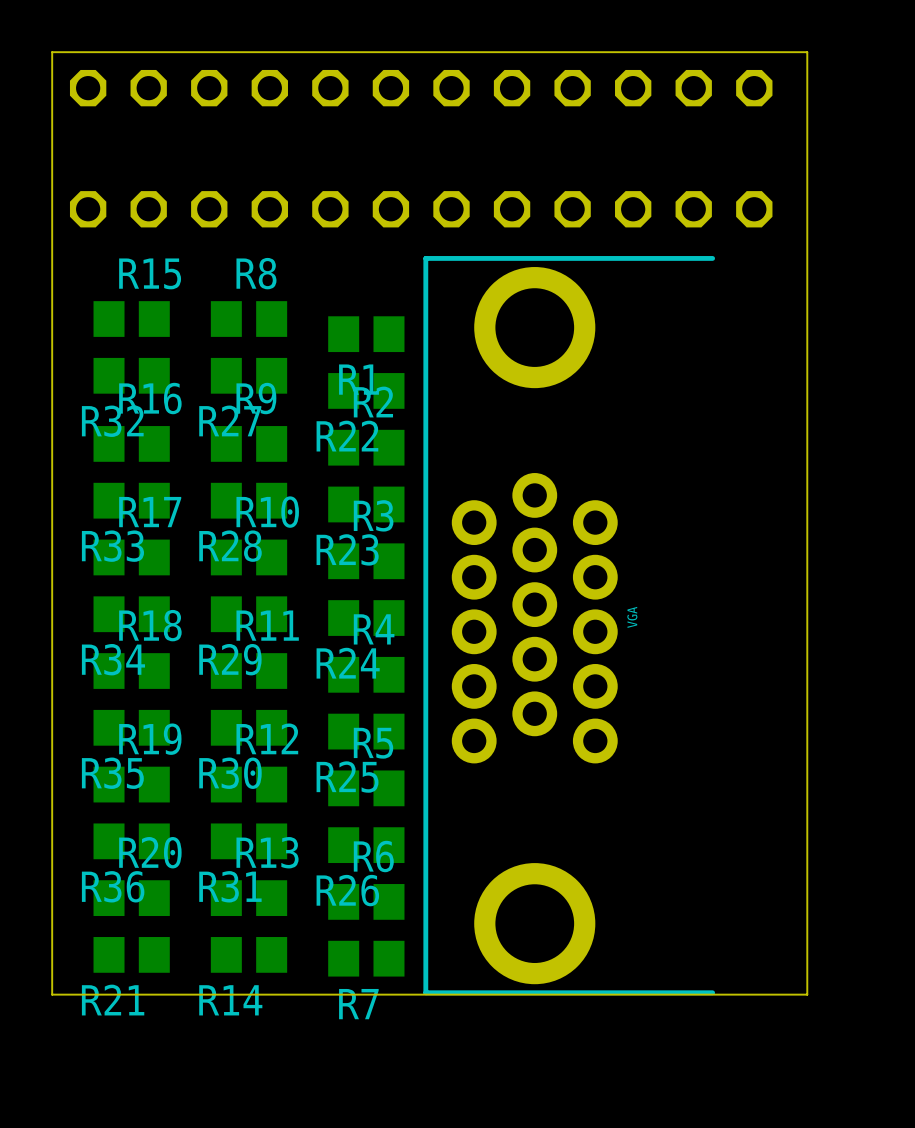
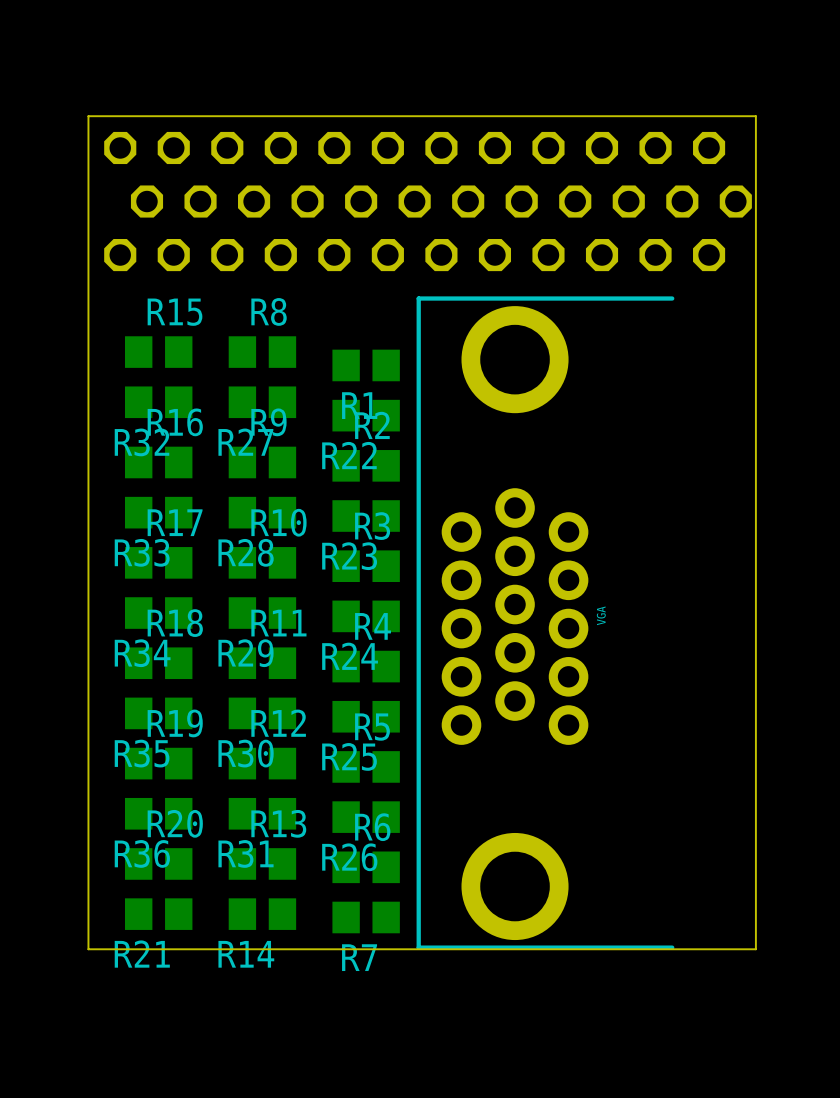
part: none -> (441, 201)

